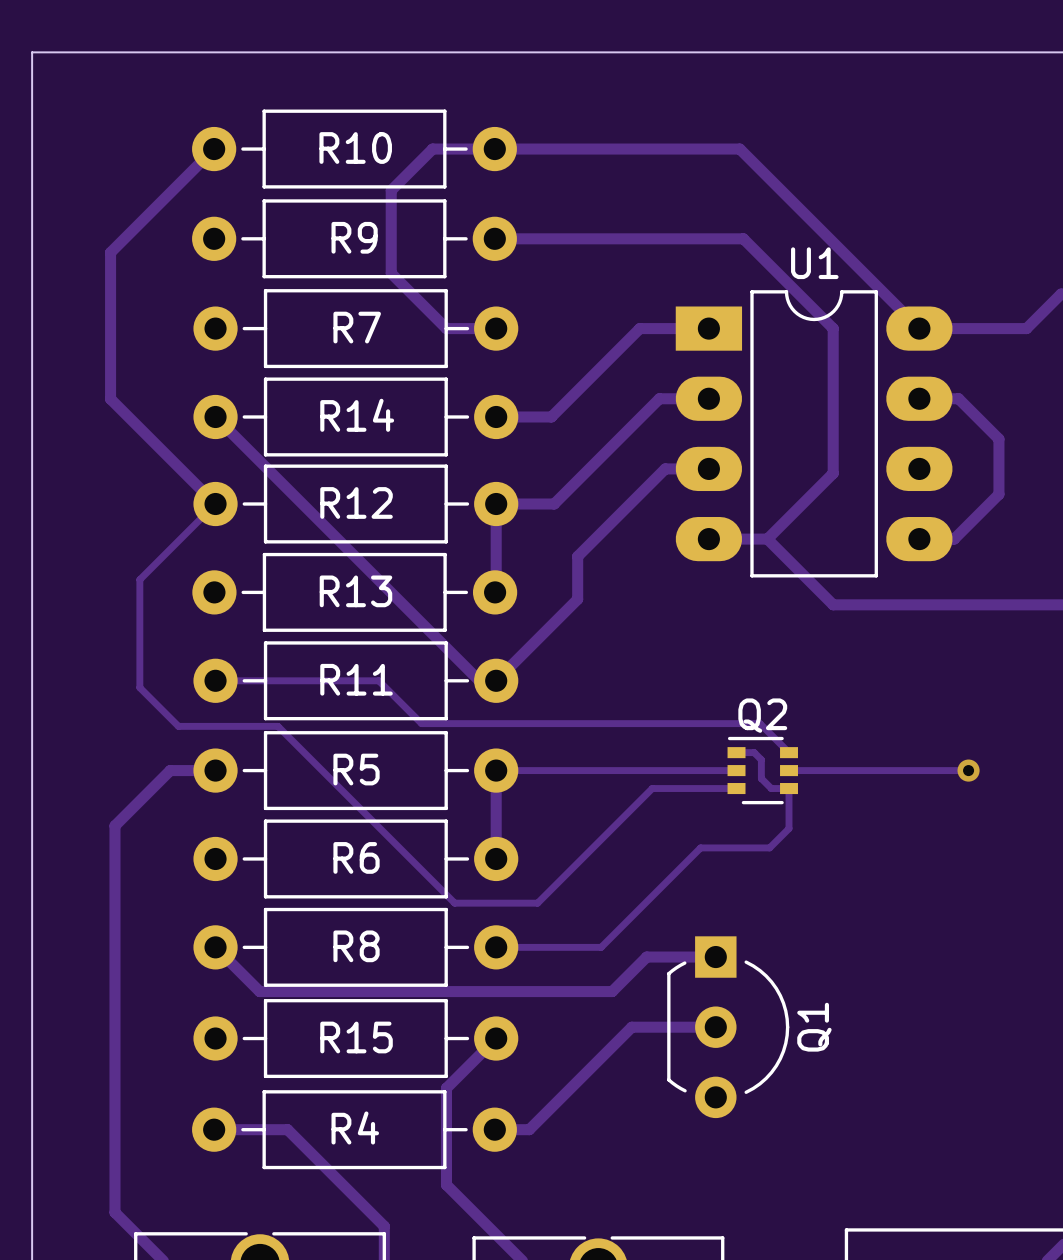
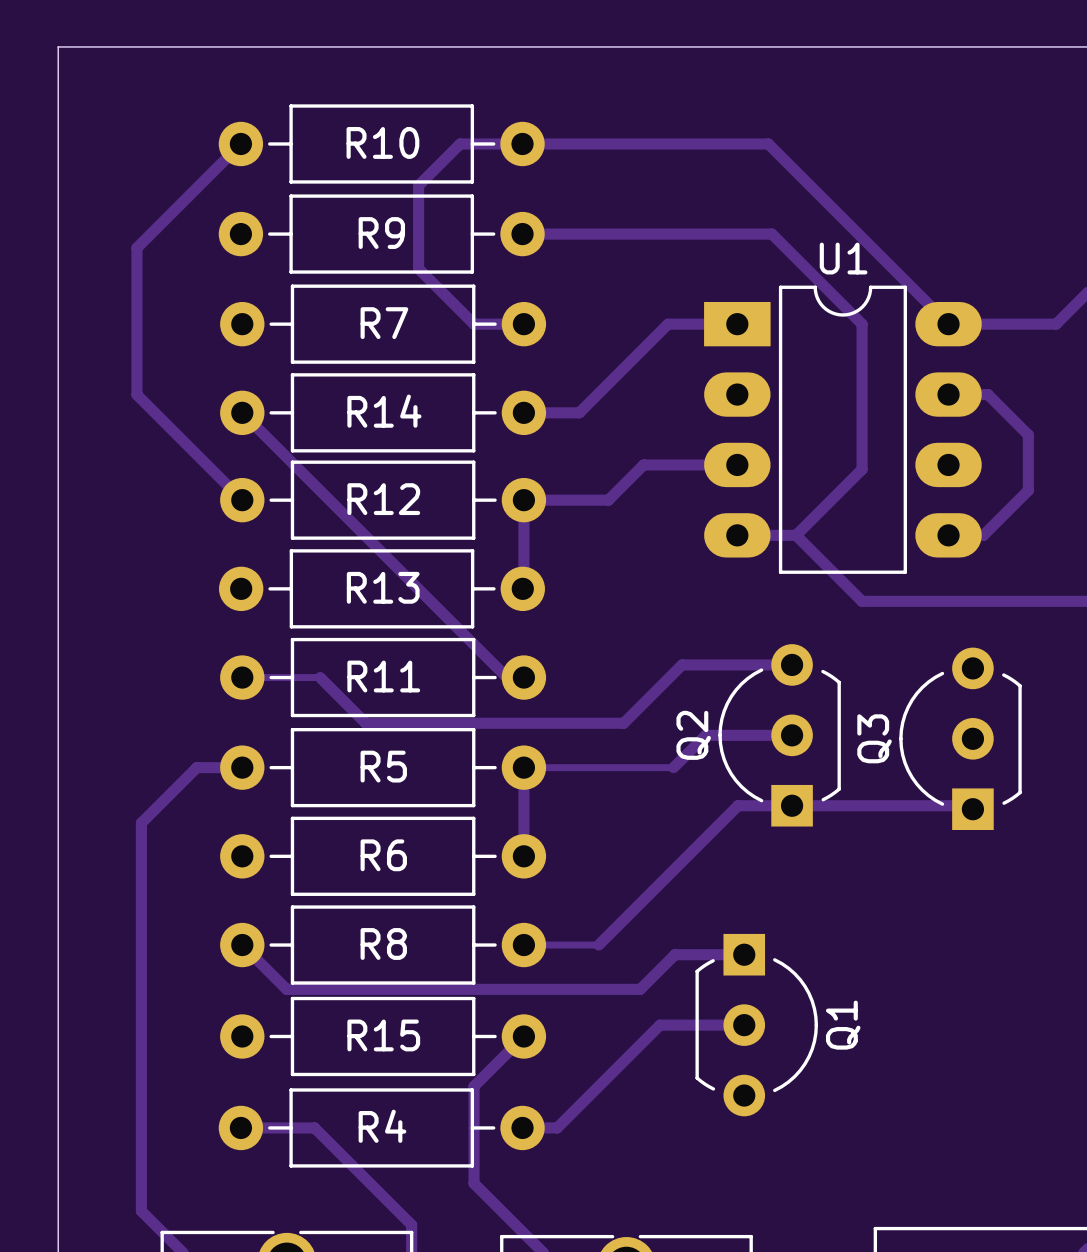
track: (708, 398) (659, 398) (554, 504) -> (693, 464) (643, 464) (608, 500) (582, 500)
track: (665, 468) (577, 556) (577, 599) (496, 680) -> none
track: (215, 504) (139, 579) (139, 687) (178, 726) (277, 726) (454, 903) (537, 903) (652, 788) (736, 788) -> none
track: (293, 680) (378, 680) (421, 723) (760, 723) (789, 752) -> (320, 677) (365, 723) (623, 723) (682, 664) (792, 664)
Q2 name position: Q2 (762, 715) -> Q2 (693, 735)
Q2 footprint: [727, 736, 798, 805] -> [718, 644, 841, 827]
Q3: none -> (960, 738)
track: (736, 752) (754, 752) (761, 759) (761, 778) (771, 788) (789, 788) (789, 828) (769, 847) (700, 847) (601, 947) (570, 947) -> (972, 809) (969, 805) (738, 805) (598, 945)
track: (645, 770) (736, 770) -> (673, 767) (705, 735) (792, 735)
track: (789, 770) (968, 770) -> none
via: (968, 770) -> none

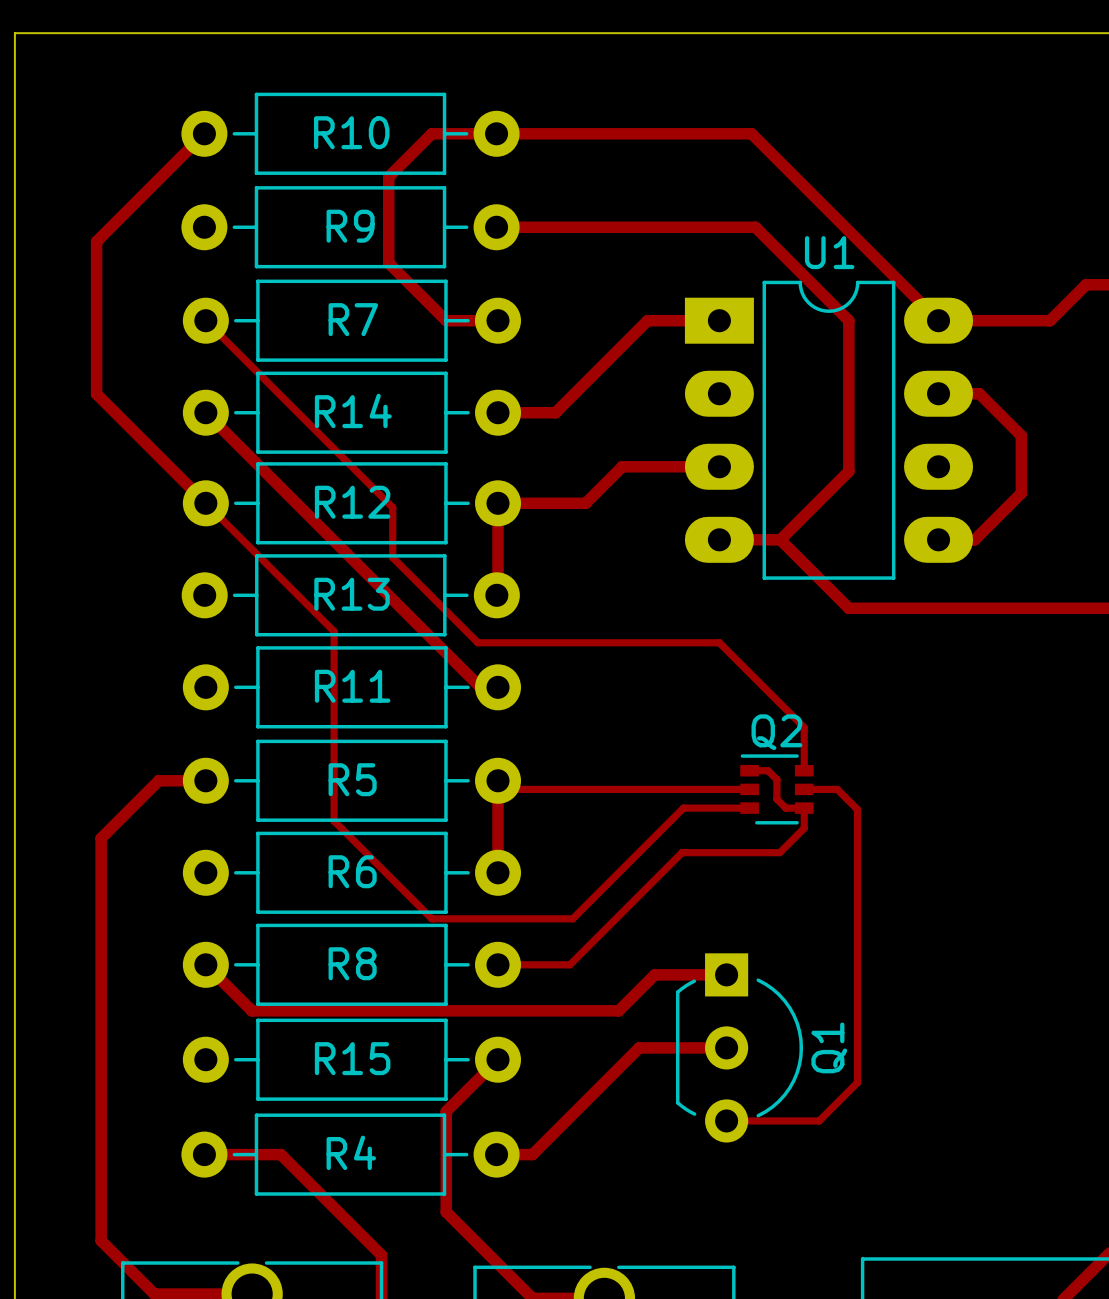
track: none -> (205, 320) (392, 507) (392, 557) (477, 642) (719, 642) (804, 727) (804, 770)
track: none -> (205, 503) (334, 631) (334, 821) (431, 918) (572, 918) (683, 808) (749, 808)
Q2 footprint: [718, 644, 841, 827] -> [740, 754, 814, 825]
track: (792, 664) (682, 664) (623, 723) (365, 723) (320, 677) (242, 677) -> none
Q2 name position: Q2 (693, 735) -> Q2 (776, 732)
track: (792, 735) (705, 735) (673, 767) (523, 767) -> (749, 789) (506, 789) (498, 780)
Q3: (960, 738) -> none
track: none -> (804, 789) (837, 789) (857, 809) (857, 1082) (819, 1120) (726, 1120)
track: (972, 809) (969, 805) (738, 805) (598, 945) (593, 945) -> (749, 770) (768, 770) (776, 779) (776, 799) (785, 808) (804, 808) (804, 828) (779, 852) (682, 852) (569, 964)

